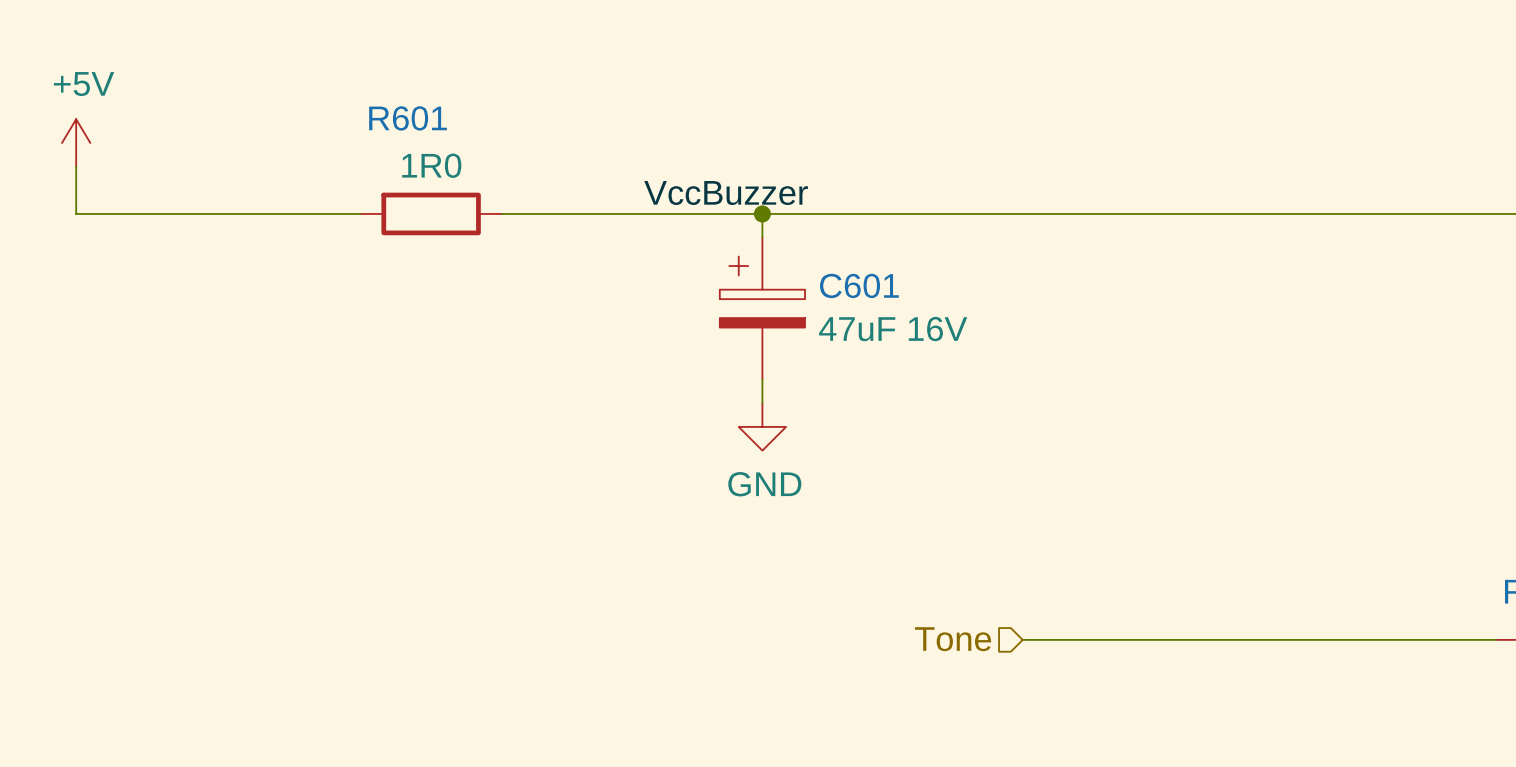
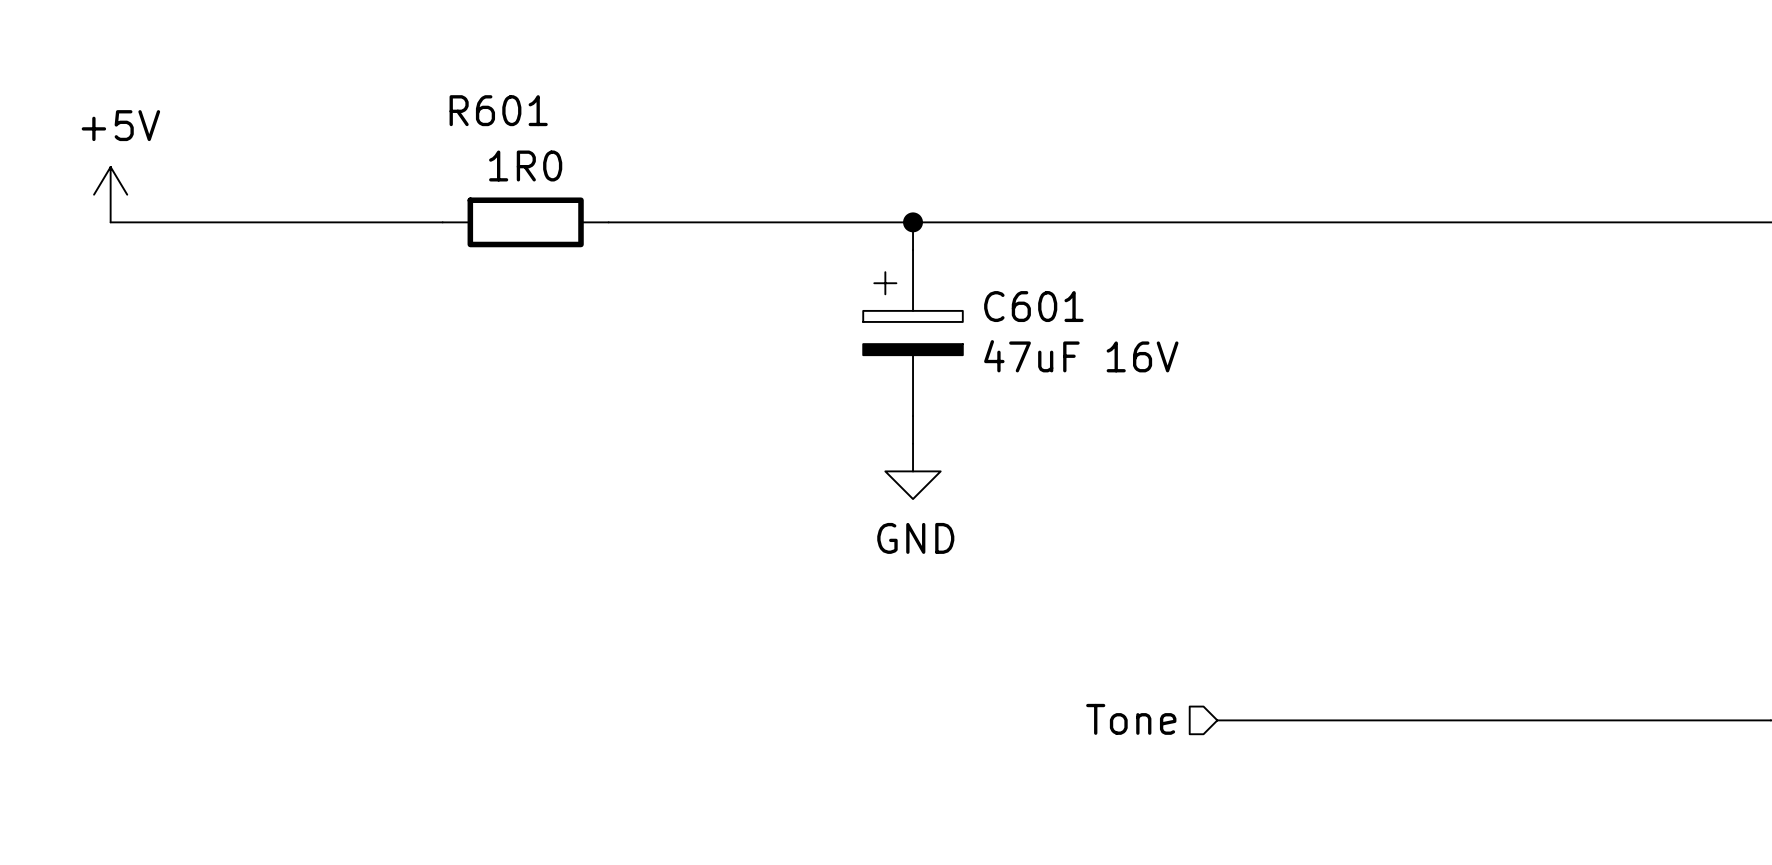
power symbol position: +5V (76, 142) -> +5V (110, 194)
label: VccBuzzer (726, 193) -> none

